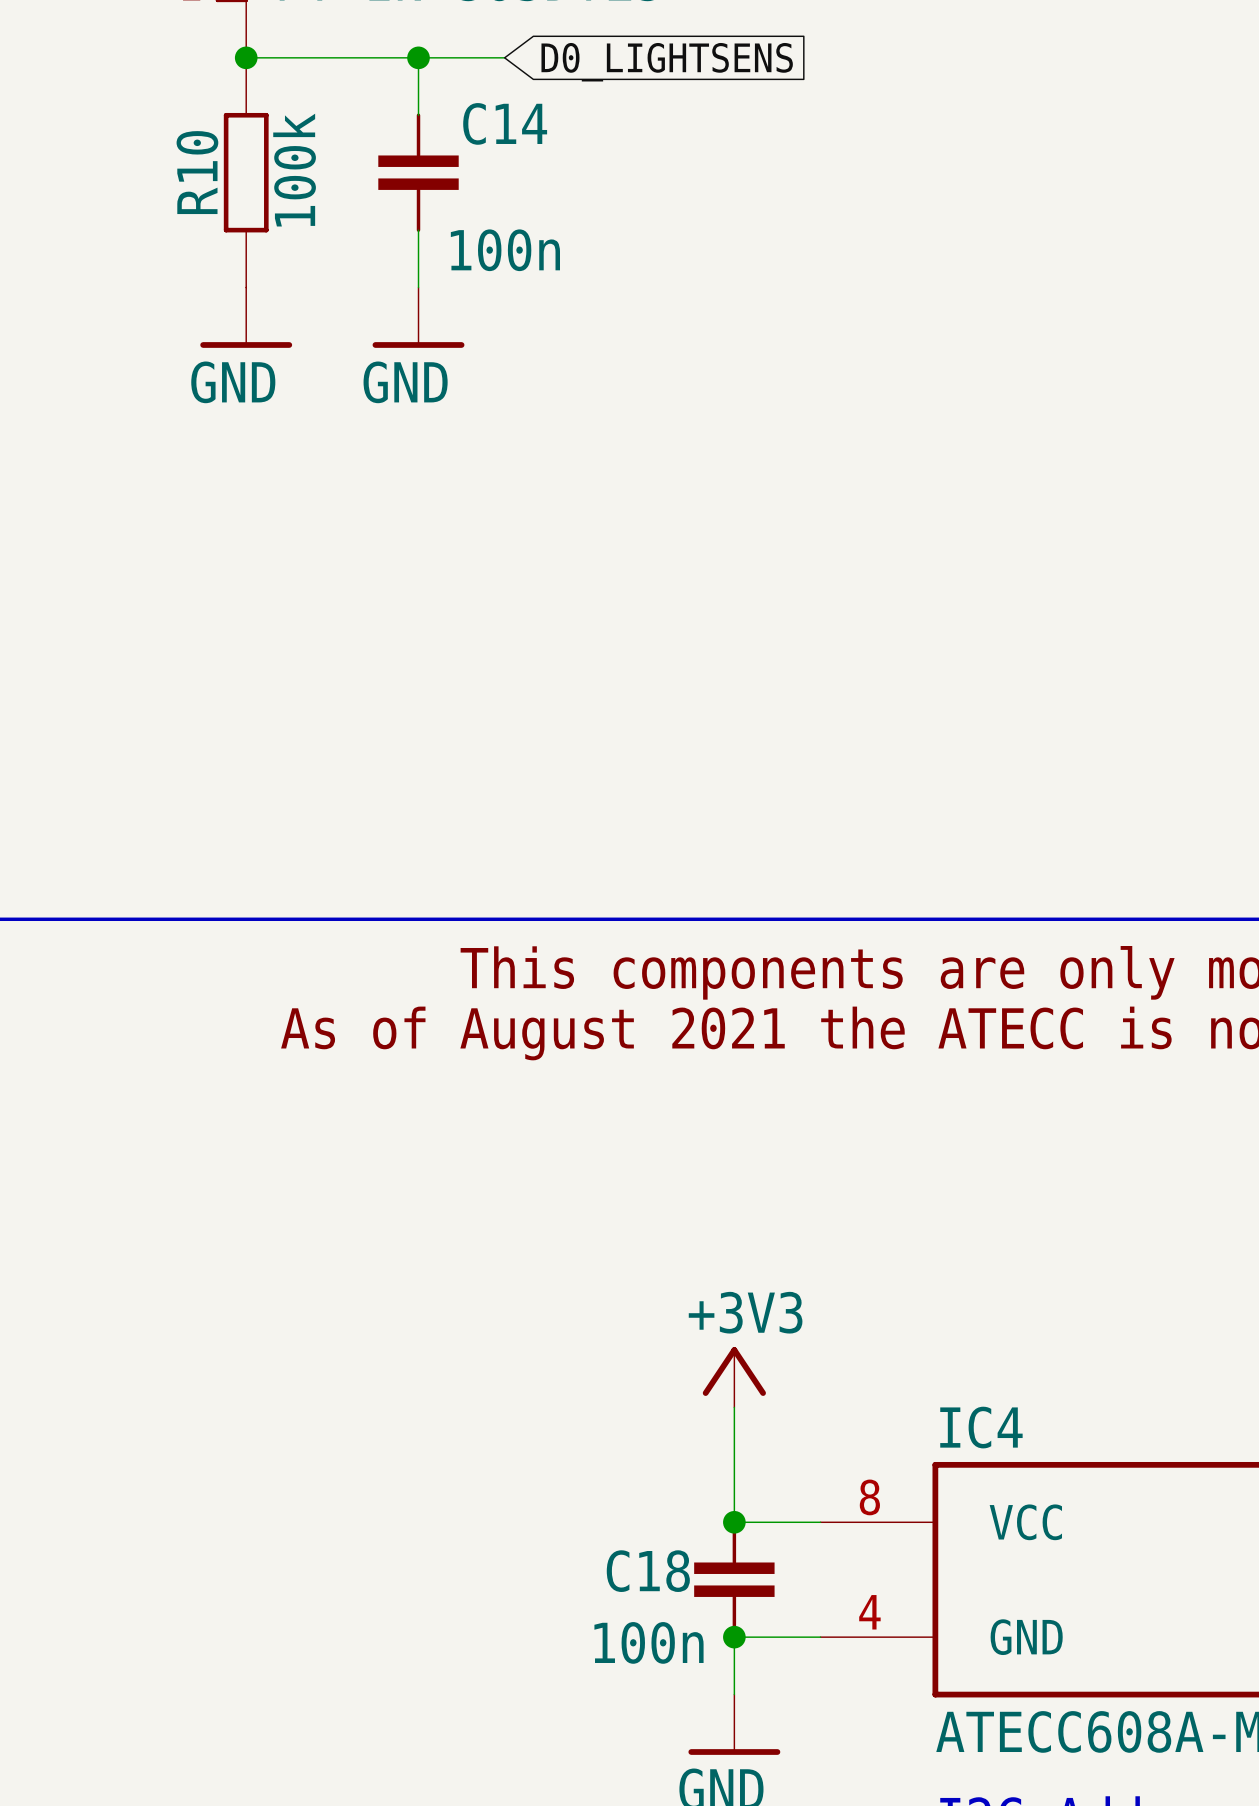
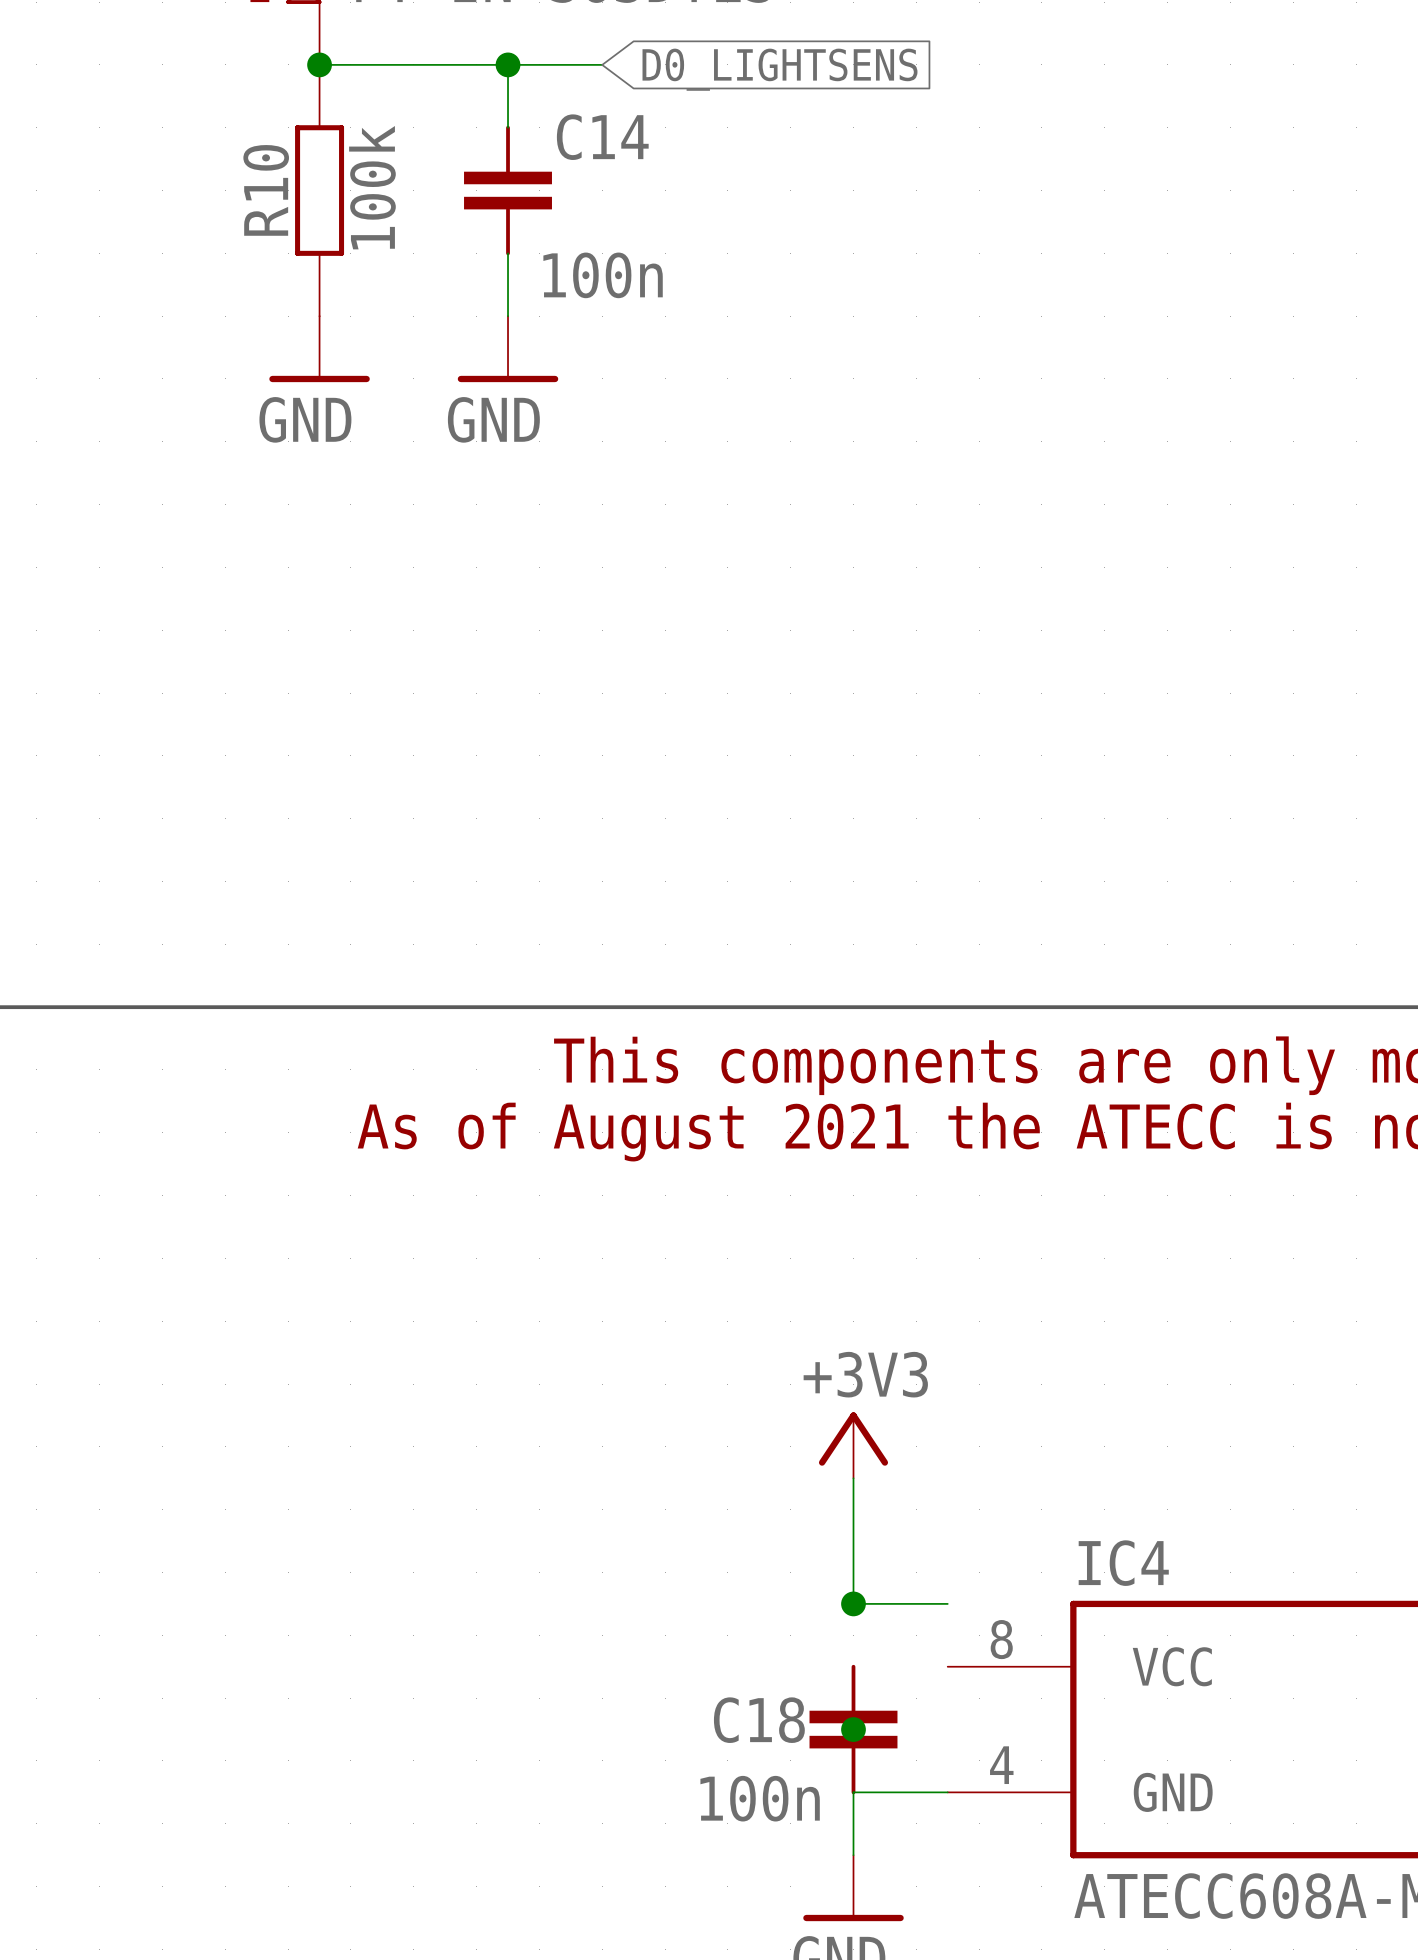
power symbol position: +3V3 (734, 1377) -> +3V3 (853, 1445)
wire: (734, 1464) (734, 1522) (820, 1522) -> (853, 1603) (947, 1603)
junction: none -> (853, 1603)
junction: (734, 1522) -> none
junction: none -> (853, 1729)
junction: (734, 1637) -> none

